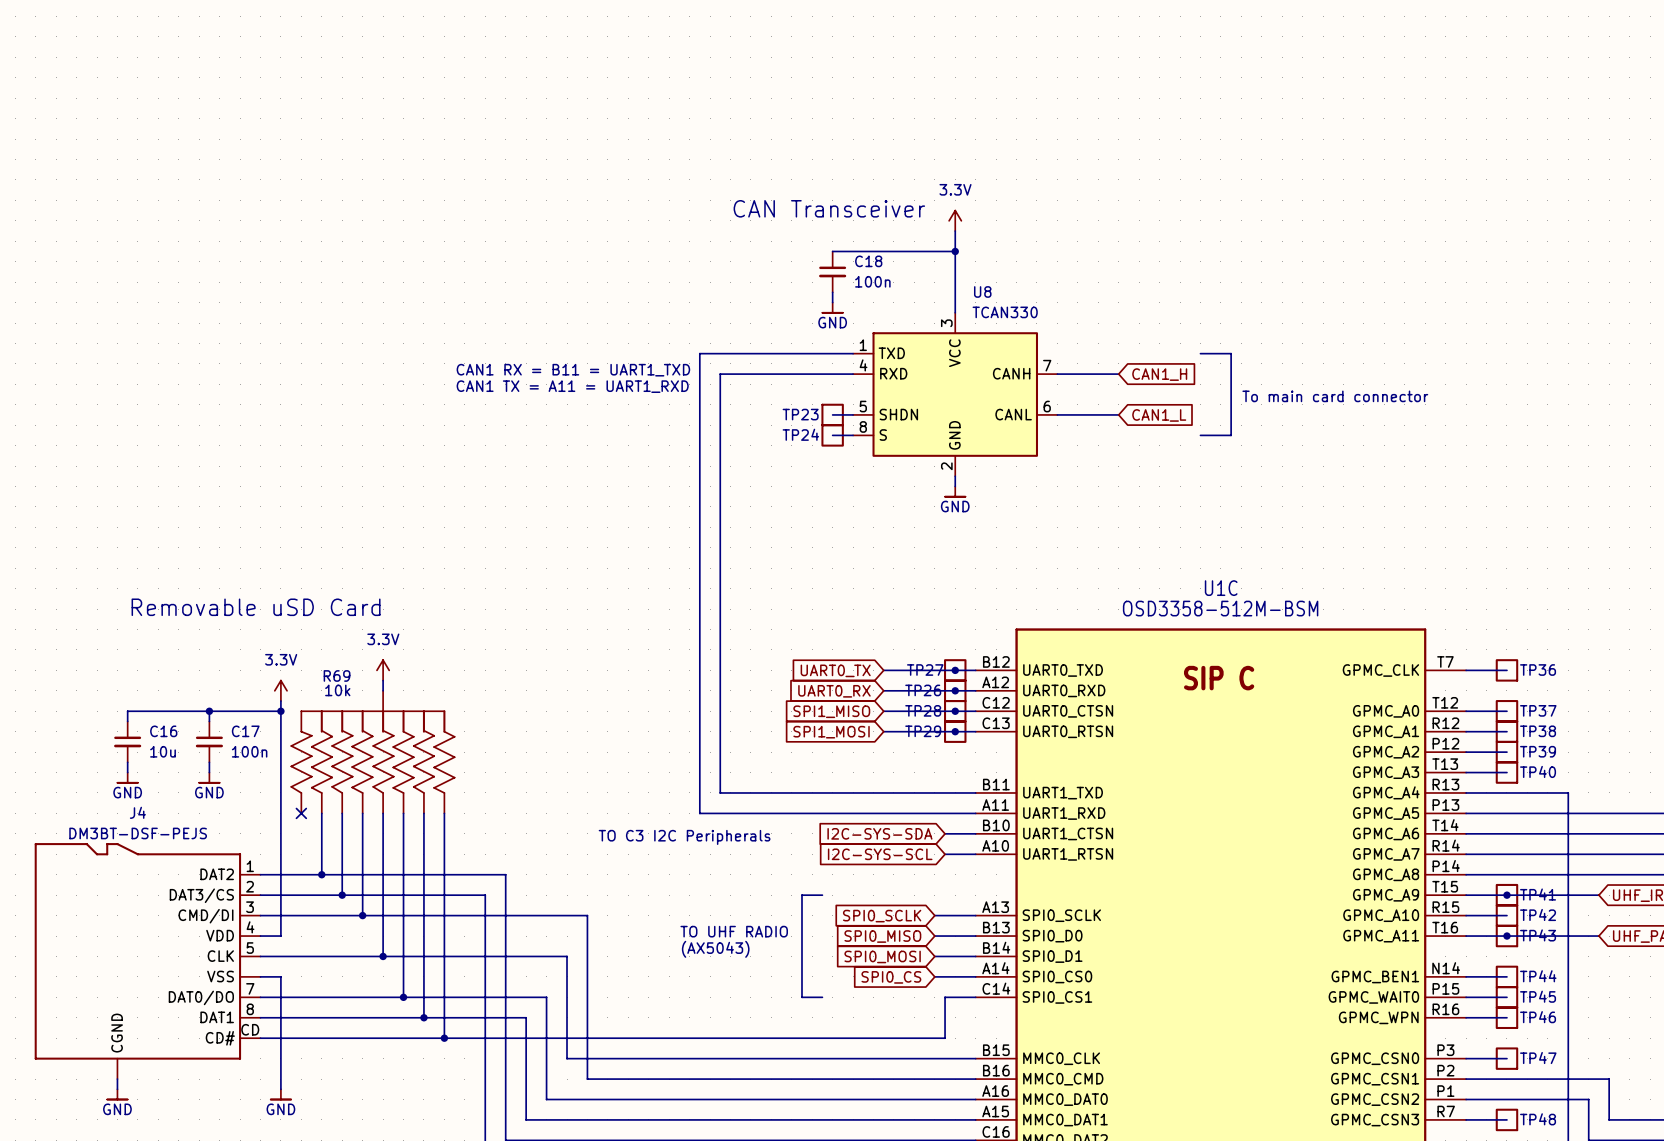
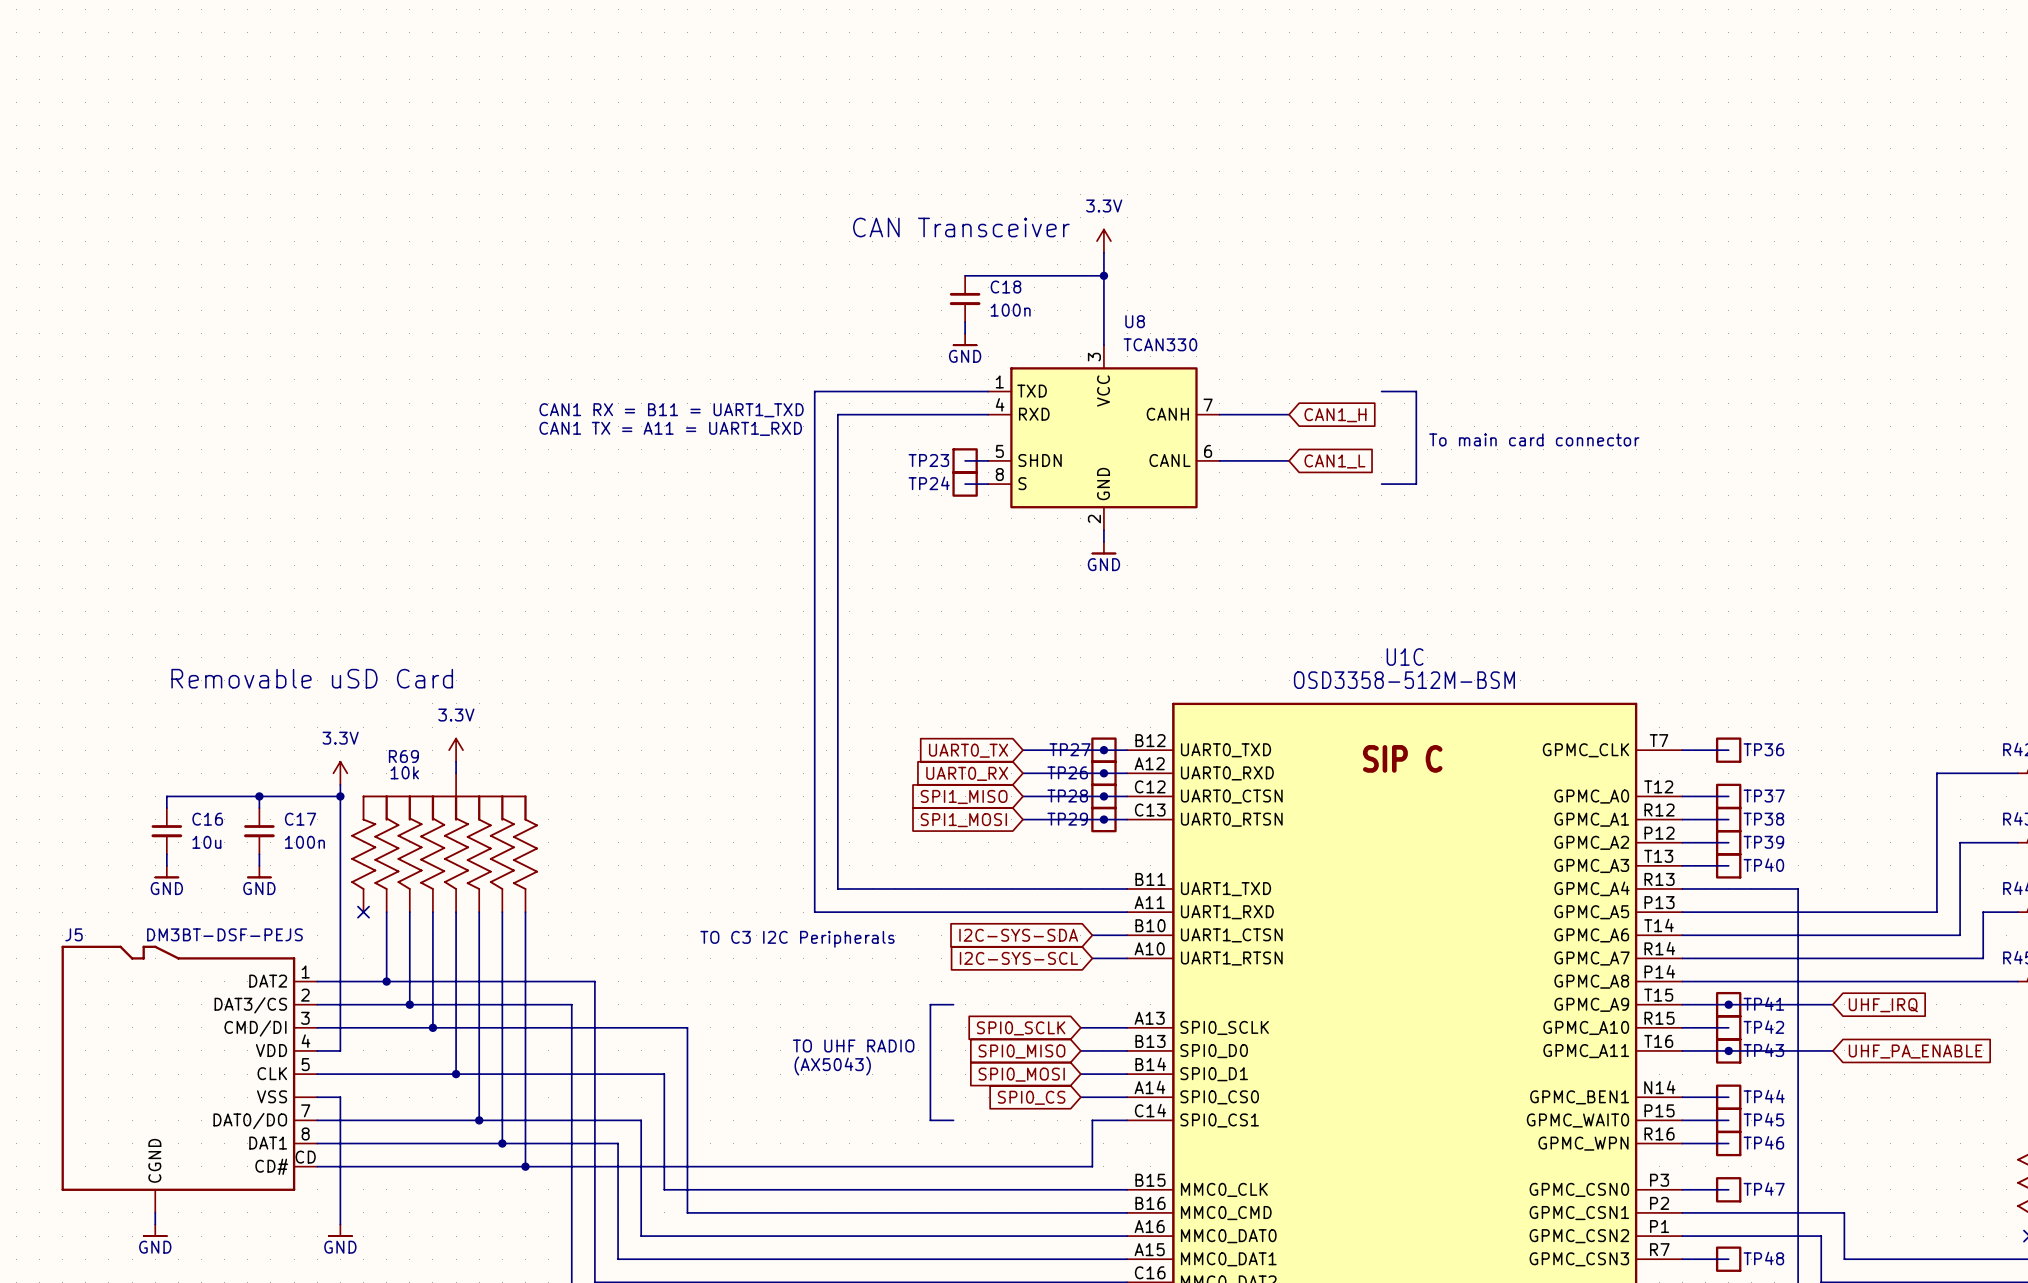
J4 name: J4 (137, 812) -> J5 (74, 934)
J4 value position: DM3BT-DSF-PEJS (138, 833) -> DM3BT-DSF-PEJS (224, 934)

